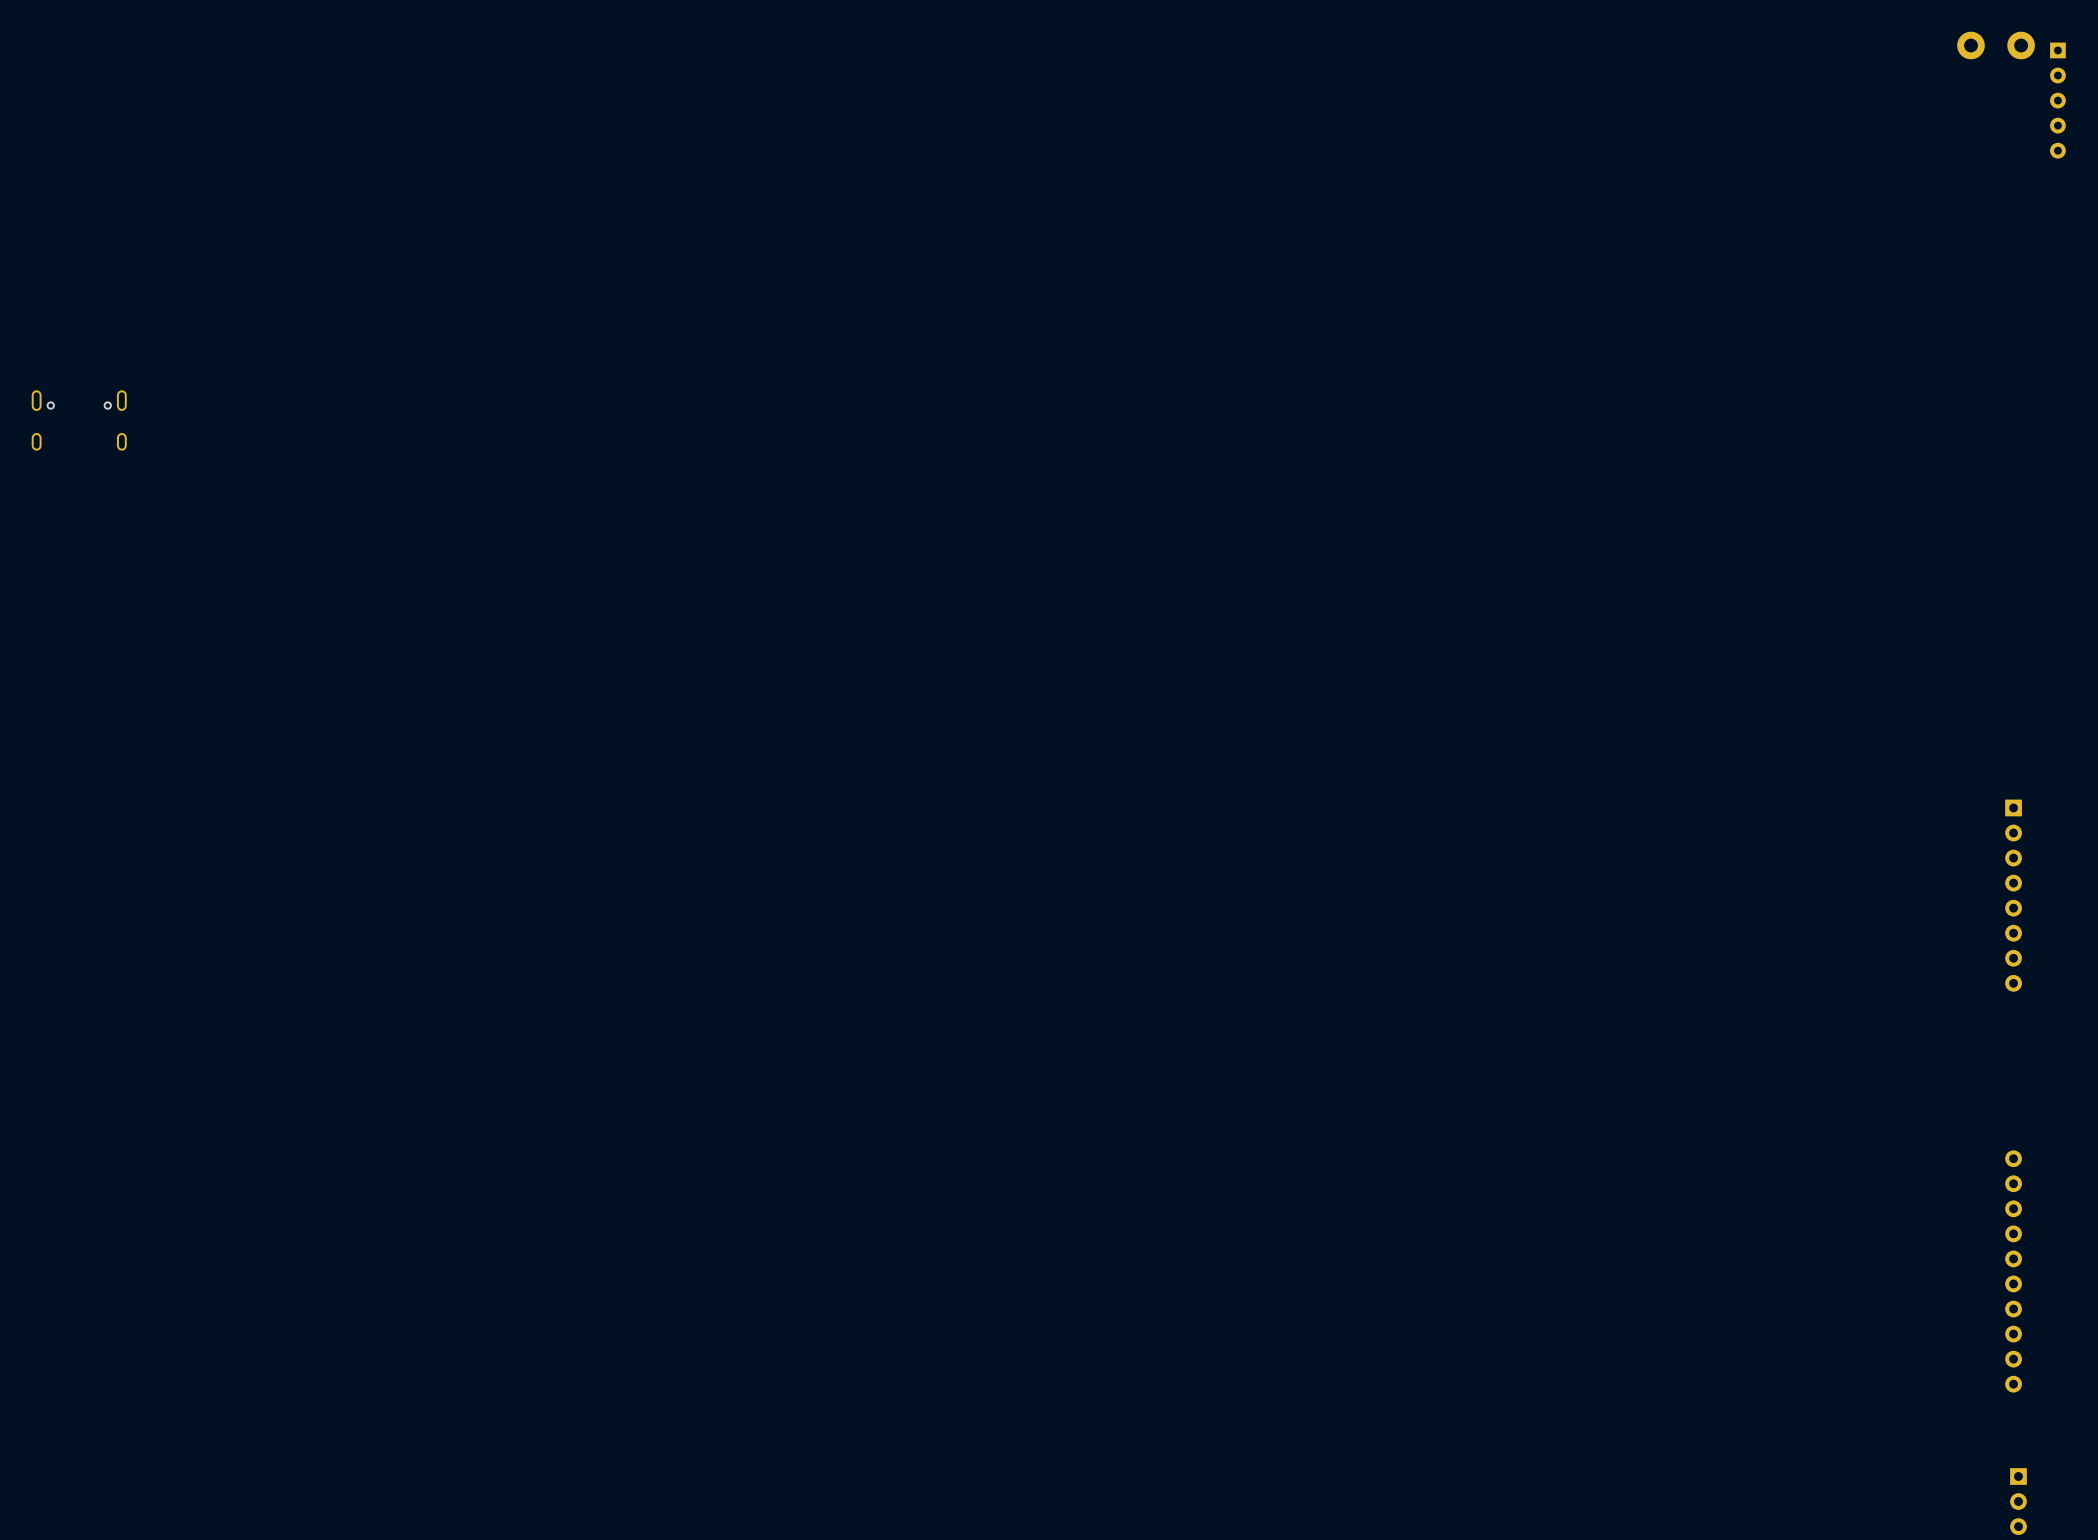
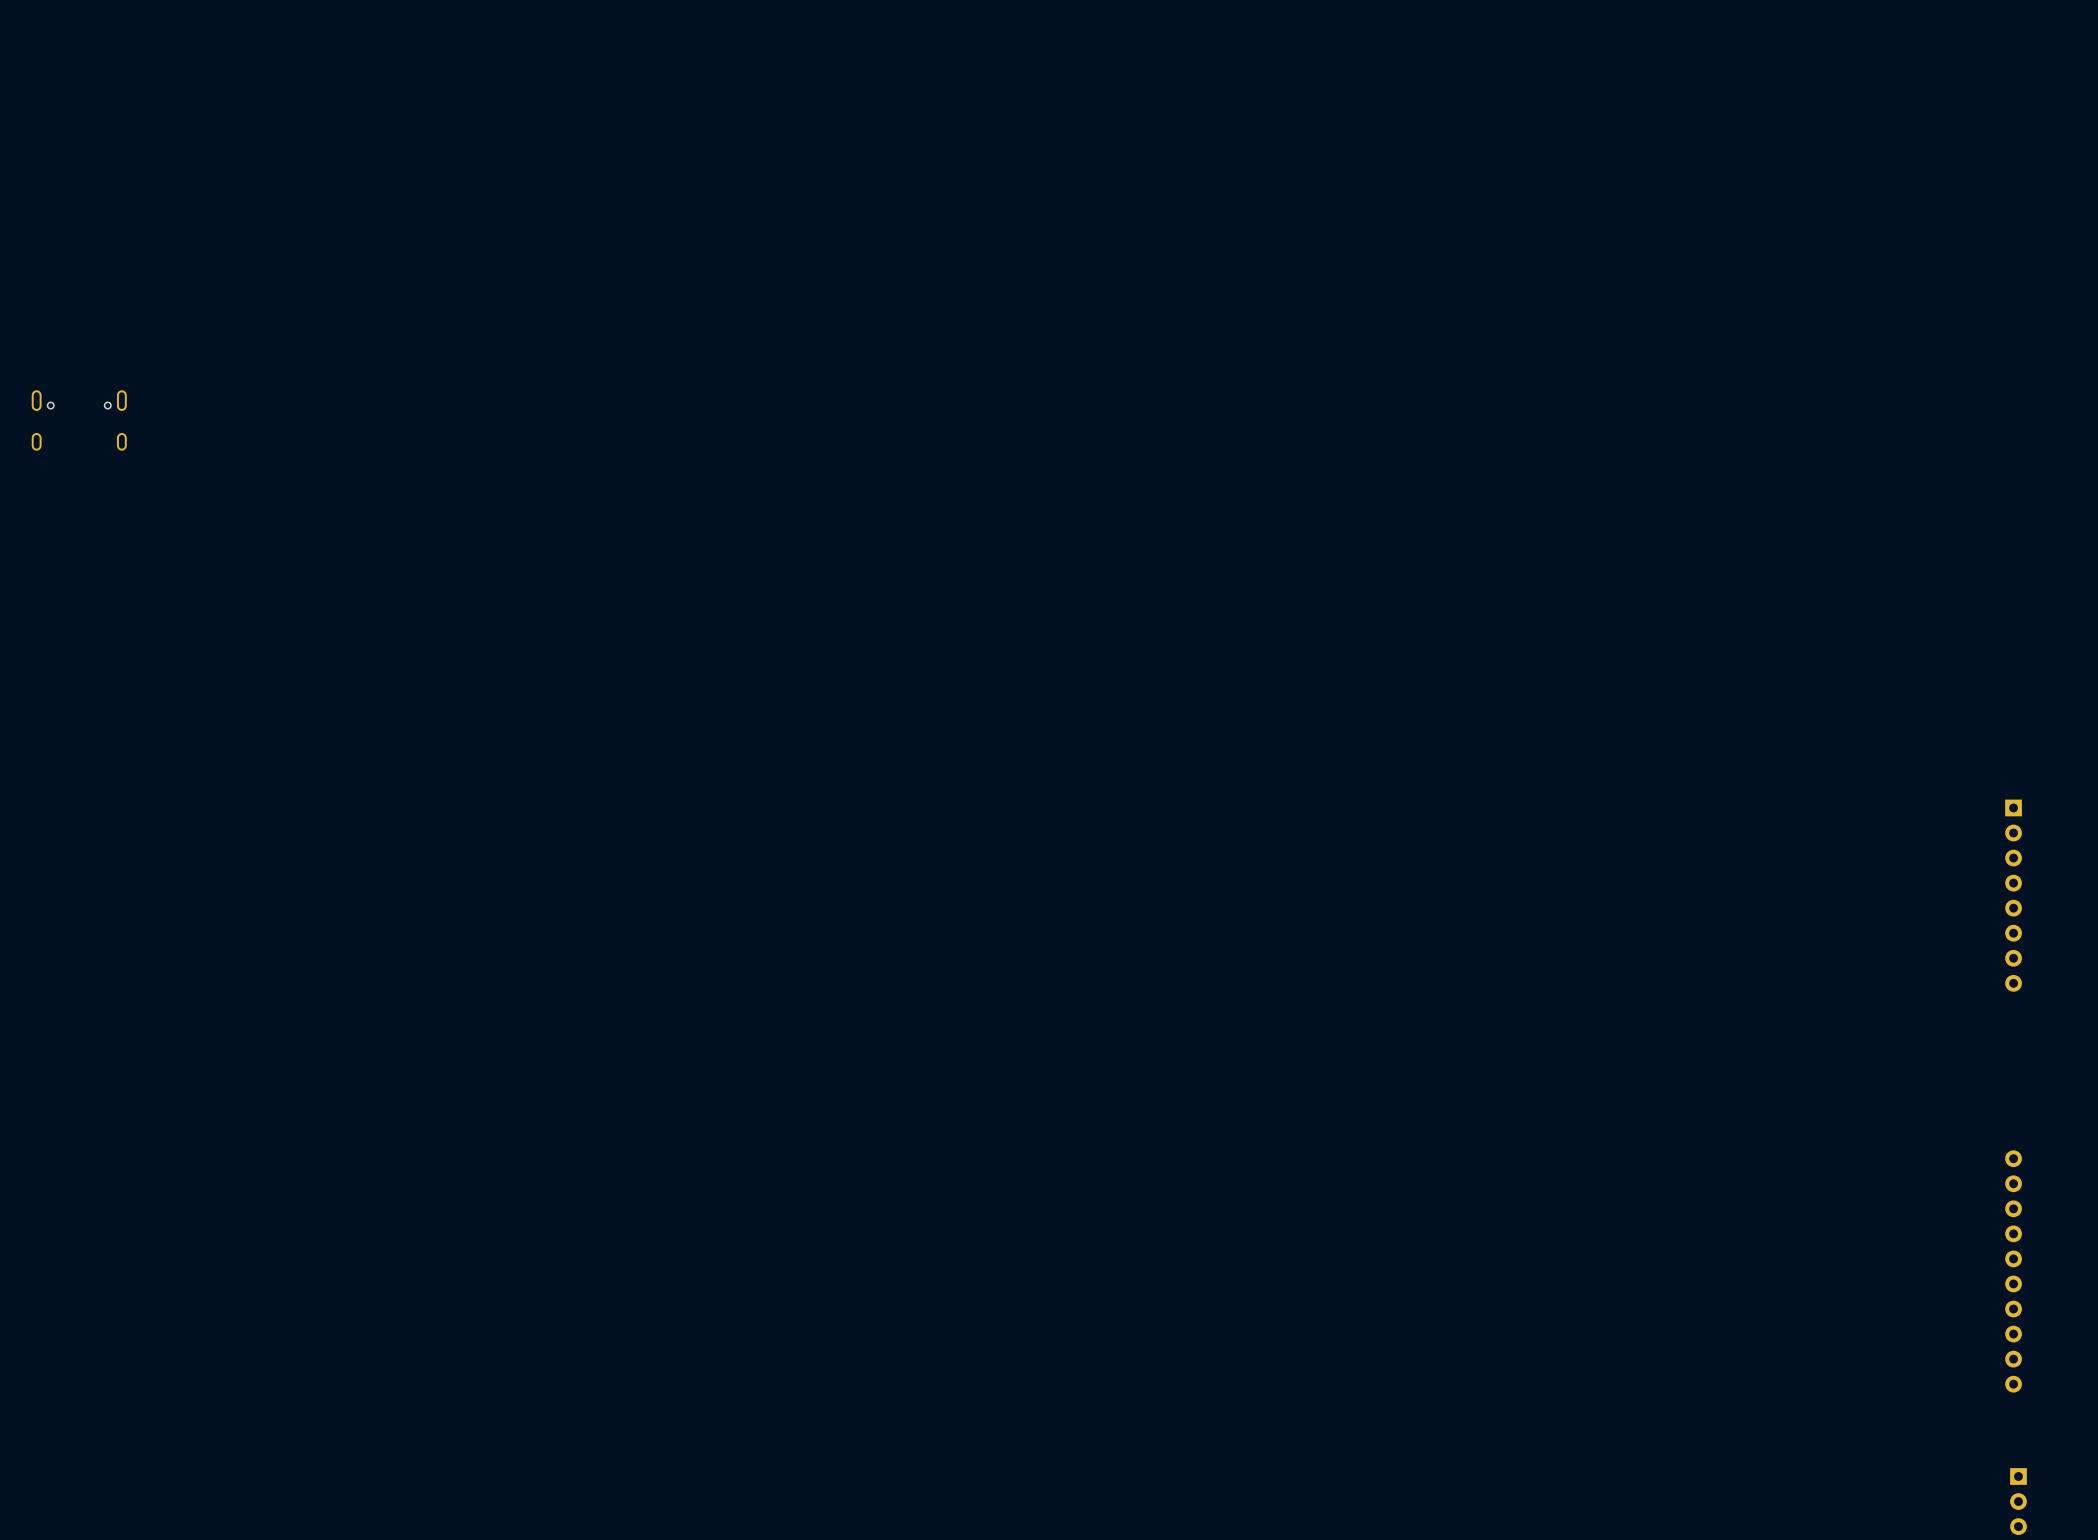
part: (1996, 45) -> none
part: (2057, 100) -> none

